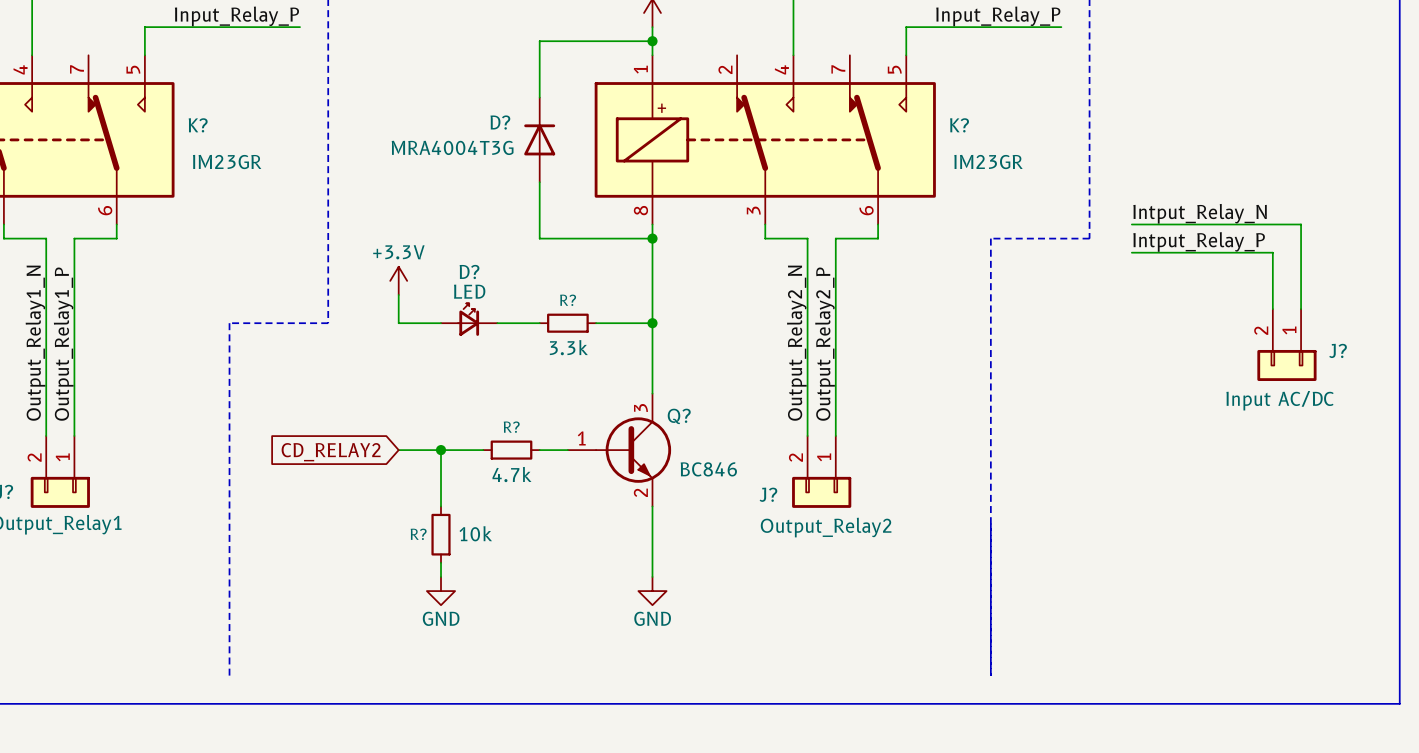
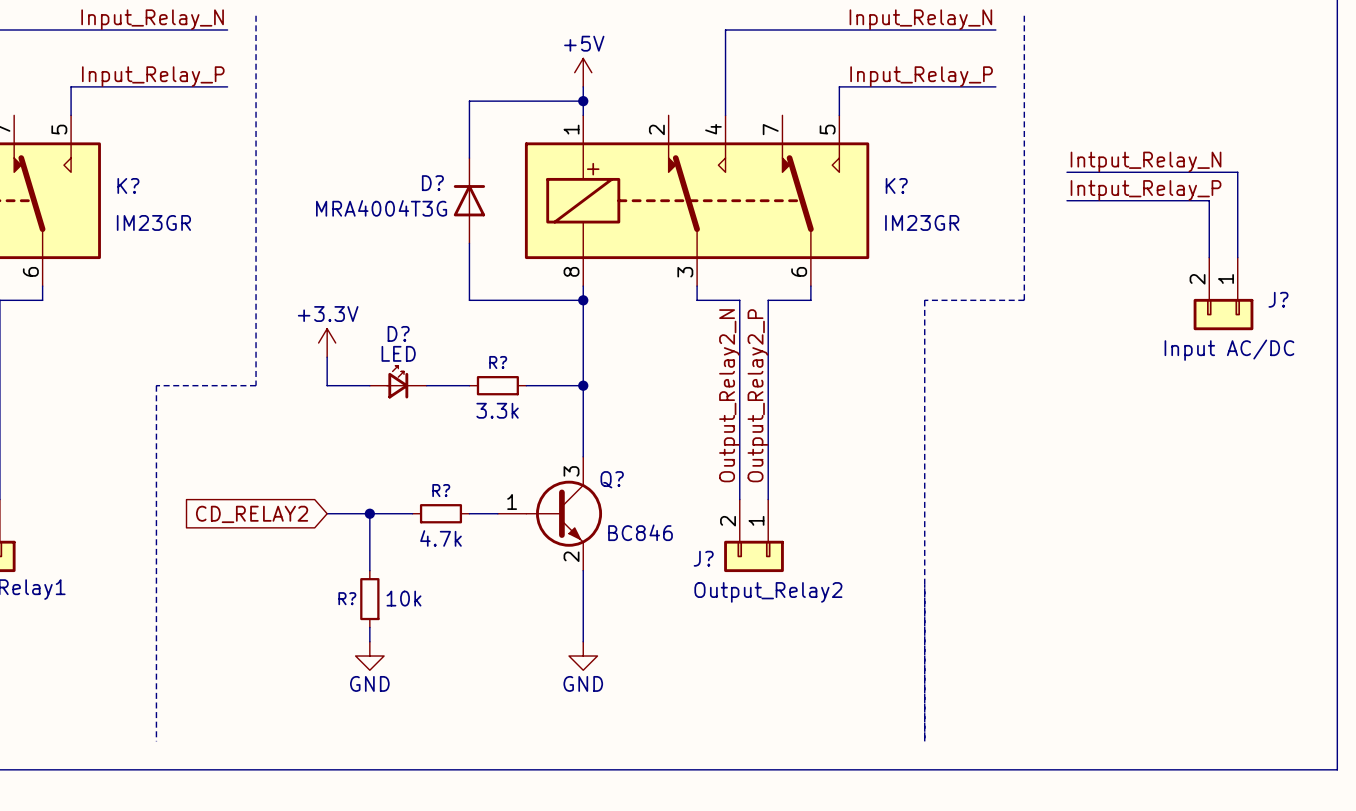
label position: Intput_Relay_N (1200, 213) -> Intput_Relay_N (1146, 161)
wire: (1131, 224) (1301, 224) (1301, 309) -> (1067, 172) (1237, 172) (1237, 257)
label position: Intput_Relay_P (1199, 241) -> Intput_Relay_P (1146, 190)
wire: (1131, 252) (1272, 252) (1272, 309) -> (1067, 200) (1209, 200) (1209, 257)
J? position: (1286, 345) -> (1223, 293)

